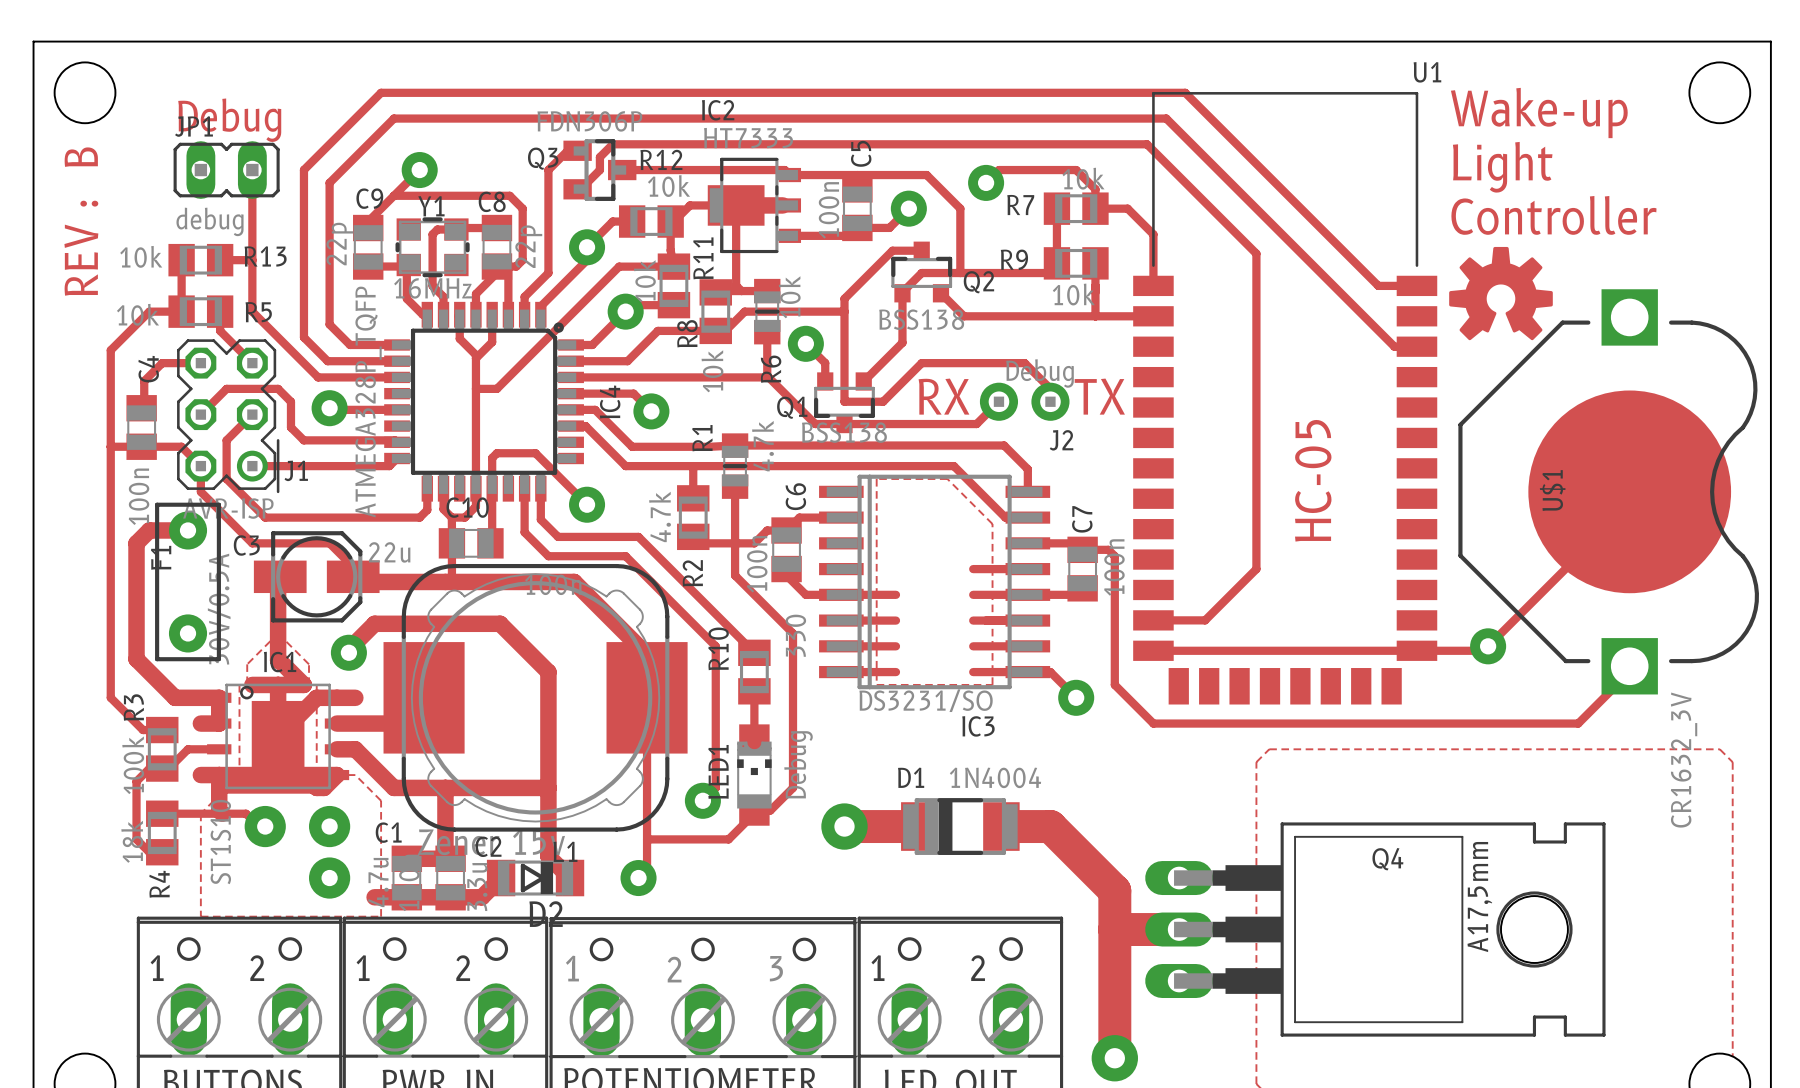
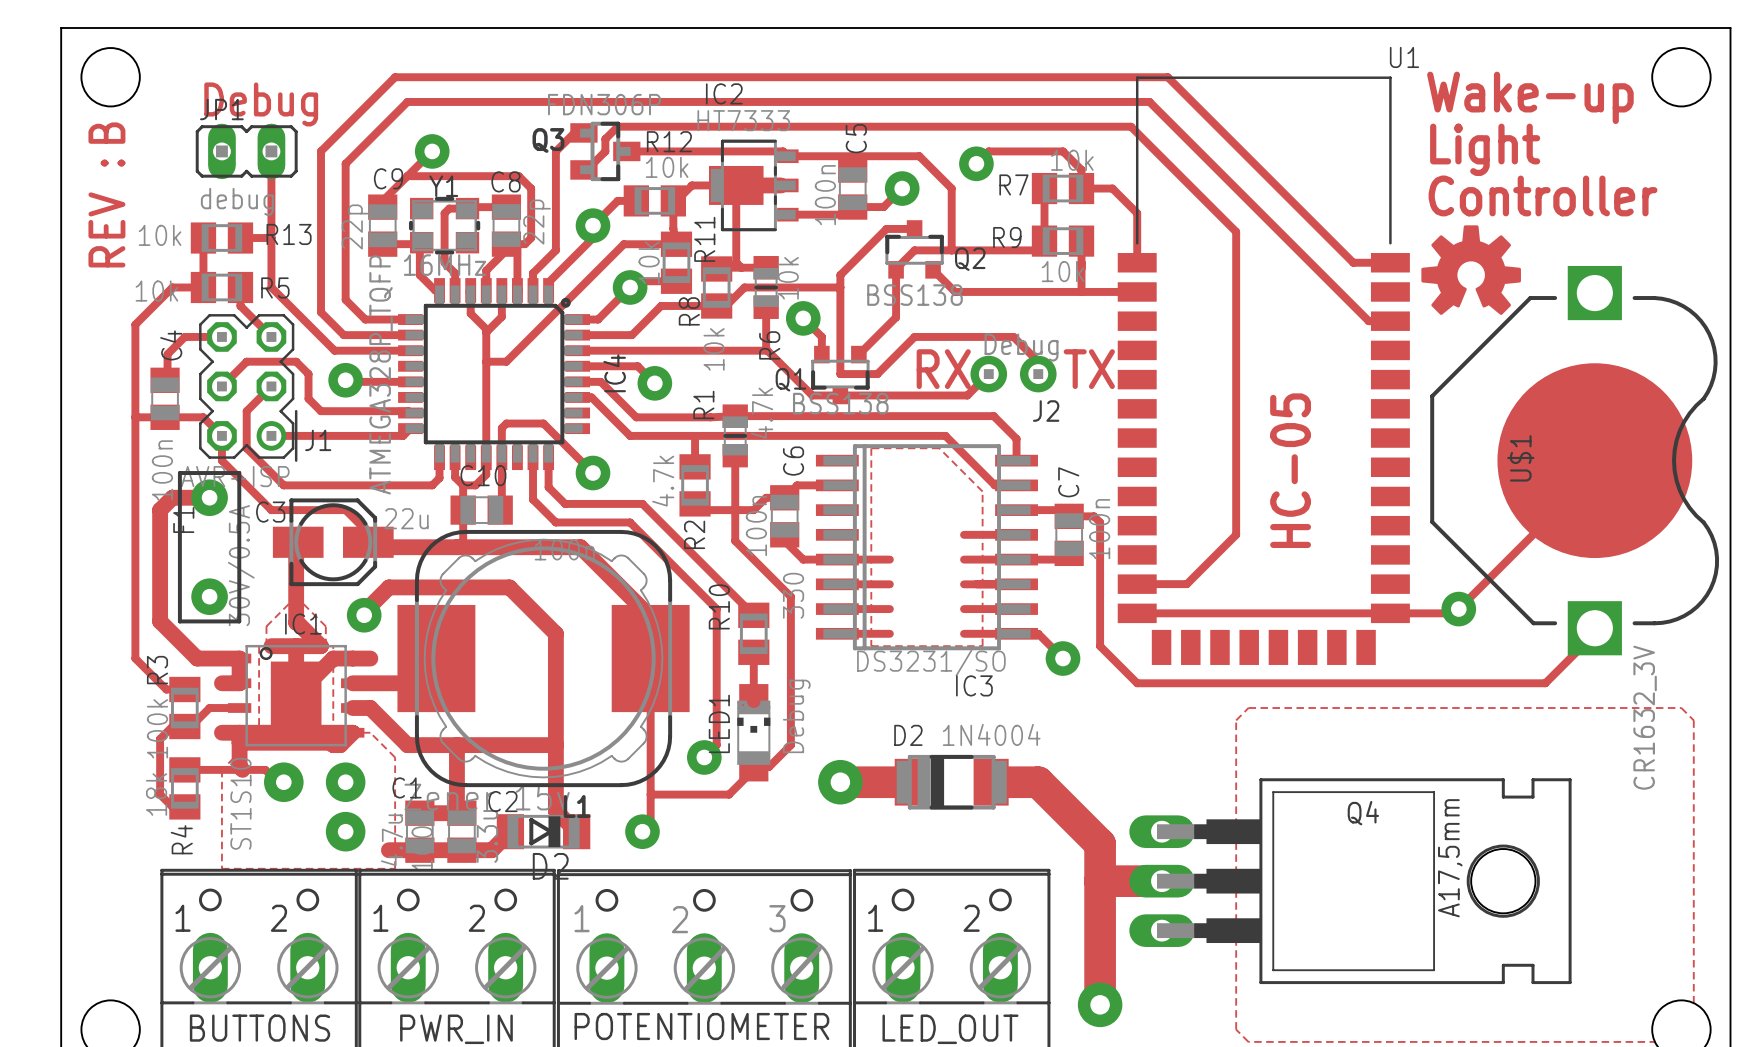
D1 name: D1 (911, 777) -> D2 (908, 735)

